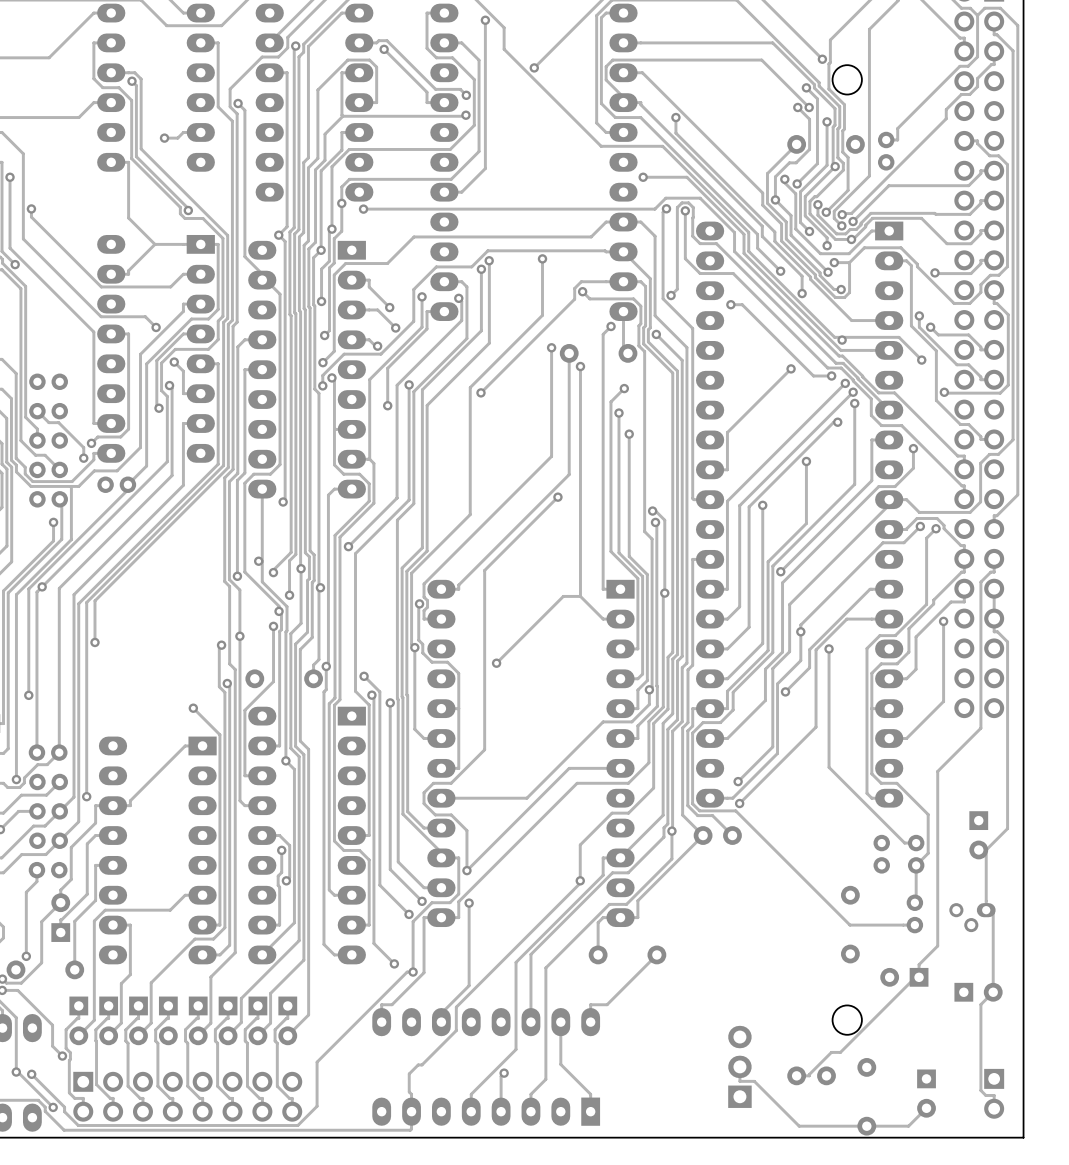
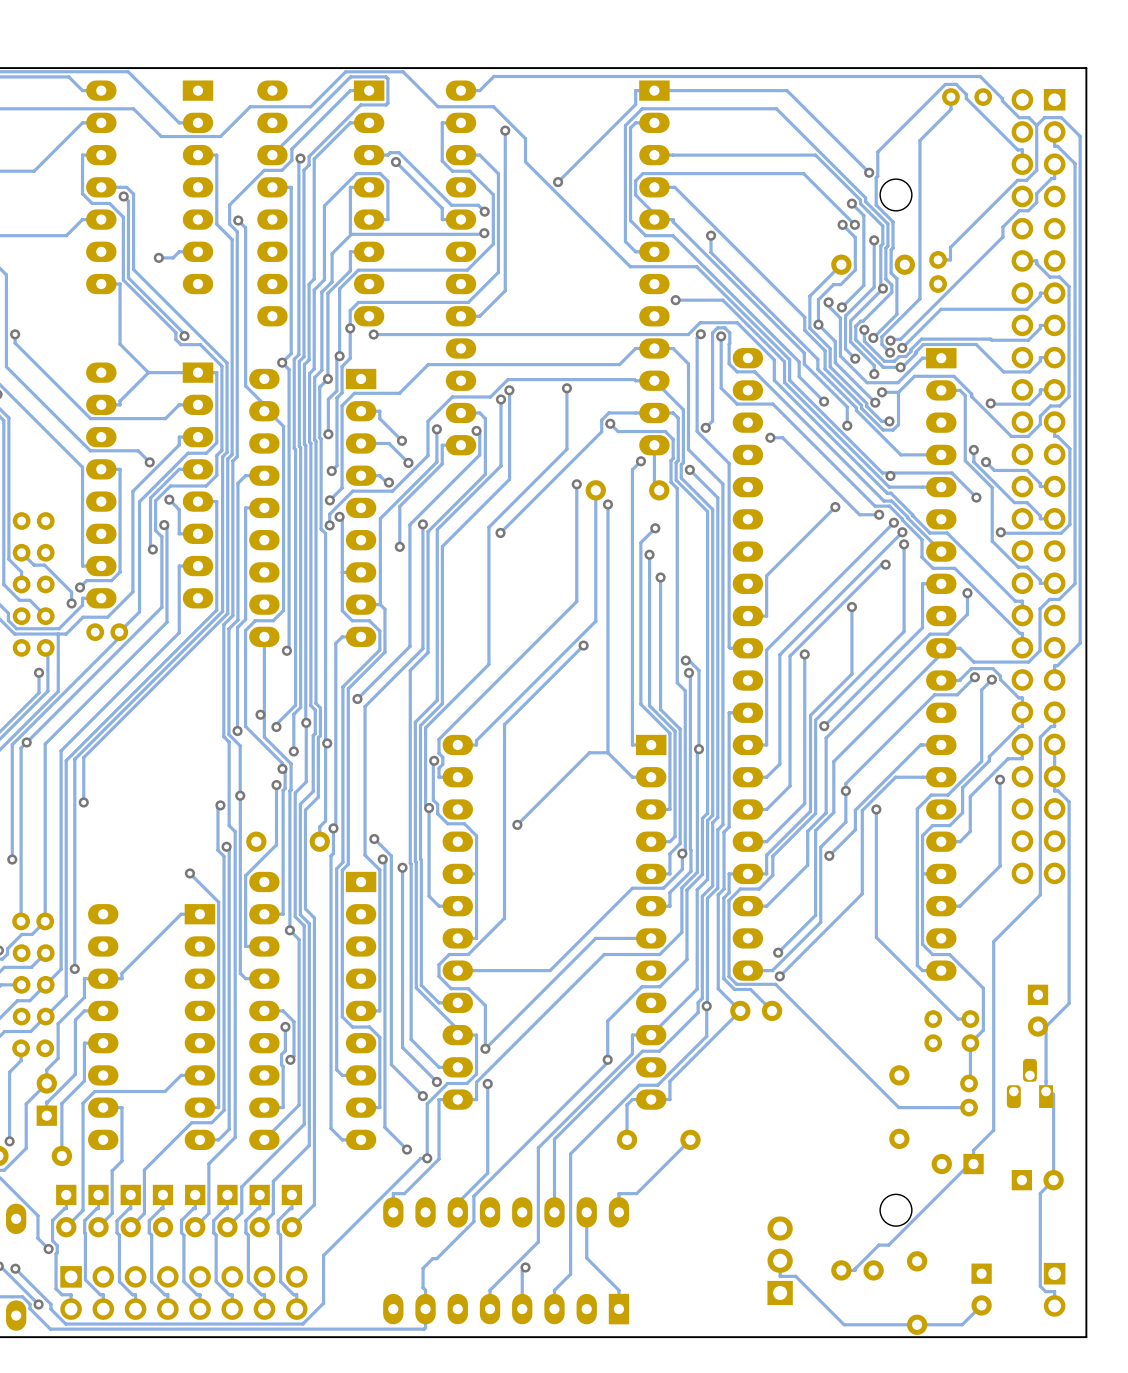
part: none -> (1029, 1083)
part: (972, 917) -> none

